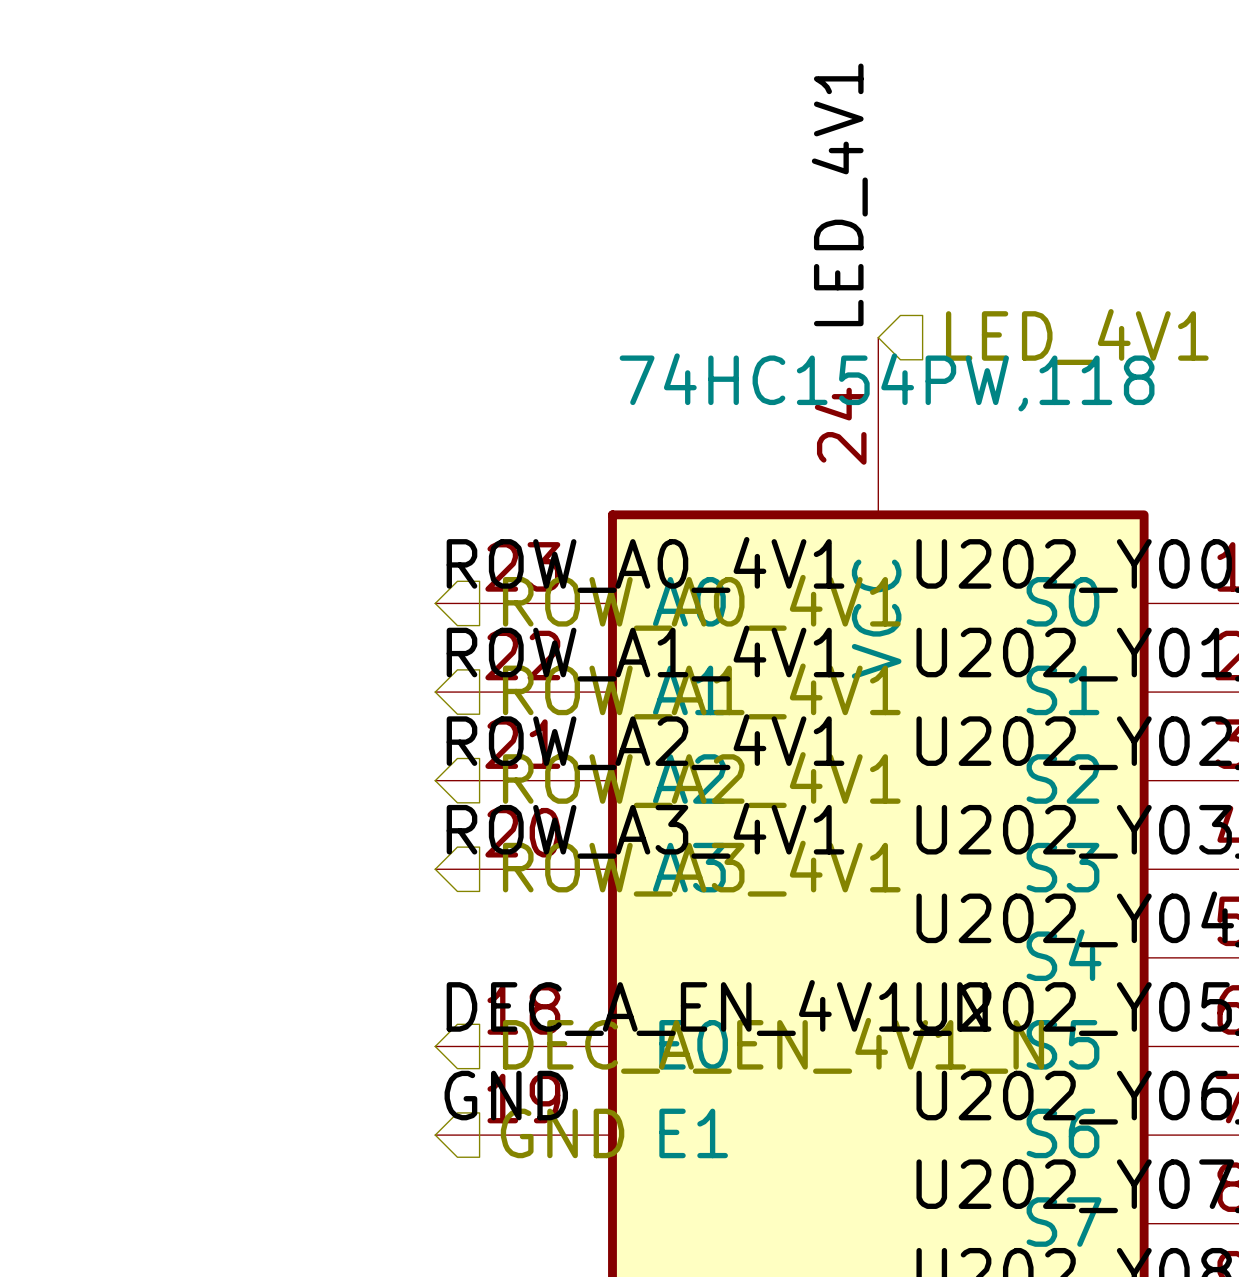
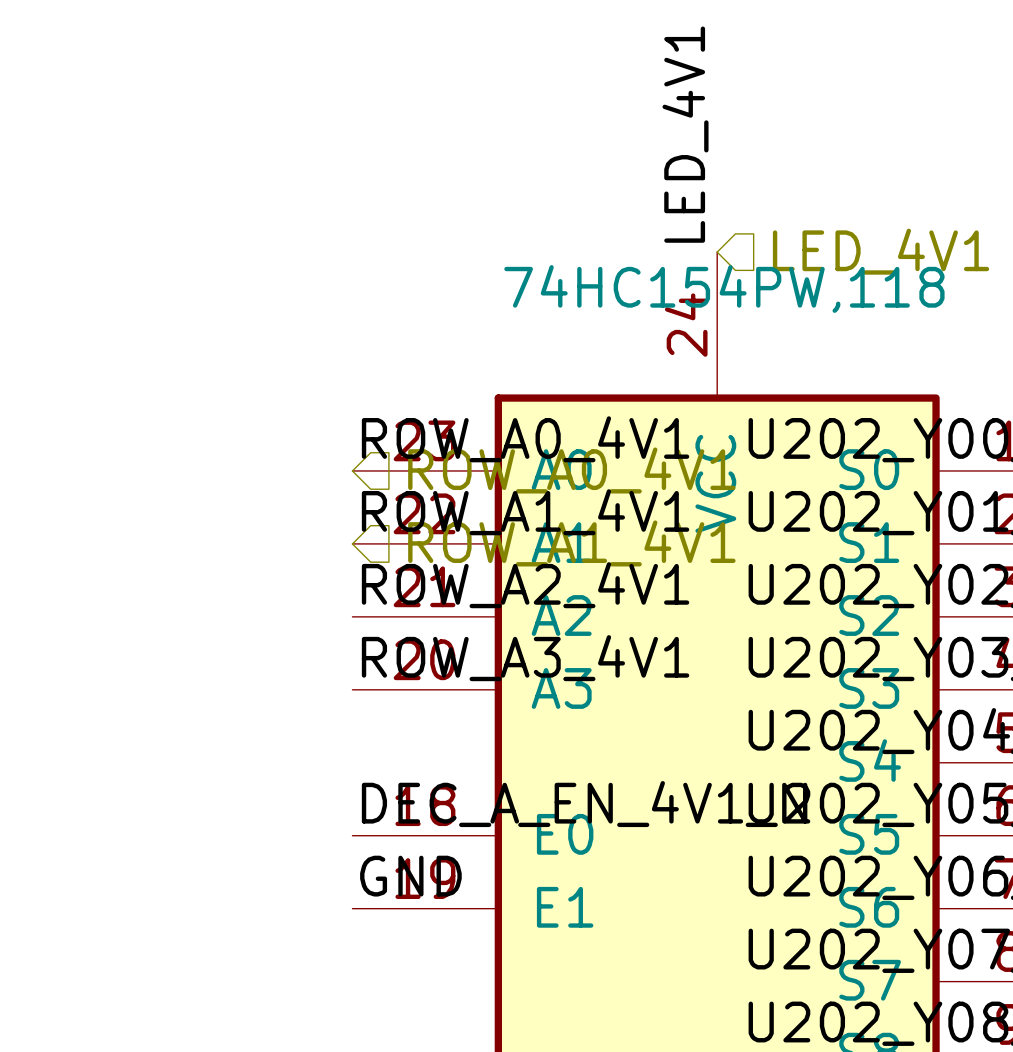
hierarchical label: ROW_A2_4V1 (701, 780) -> none
hierarchical label: ROW_A3_4V1 (701, 868) -> none
hierarchical label: DEC_A_EN_4V1_N (773, 1045) -> none
hierarchical label: GND (562, 1133) -> none

